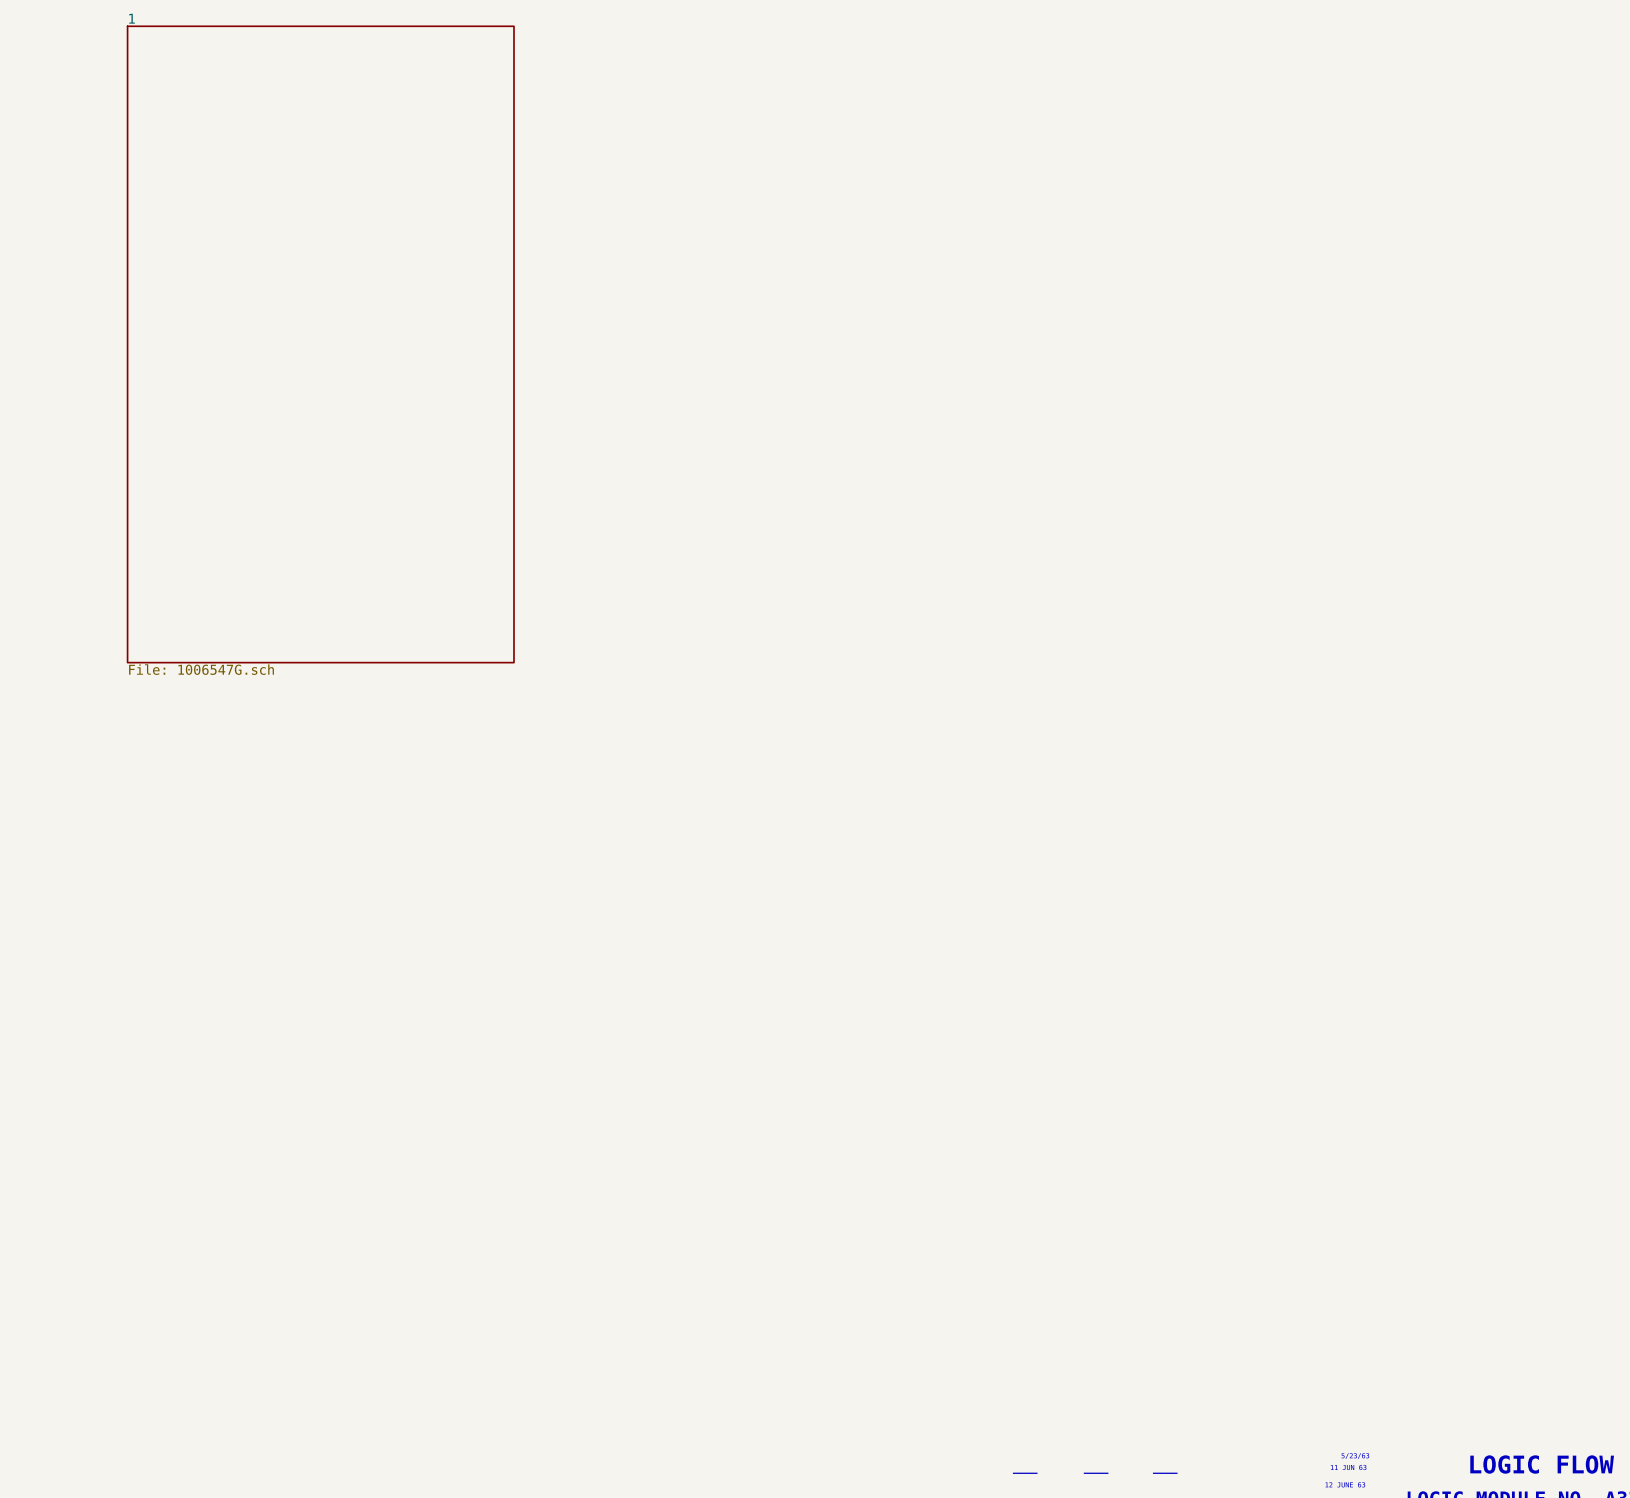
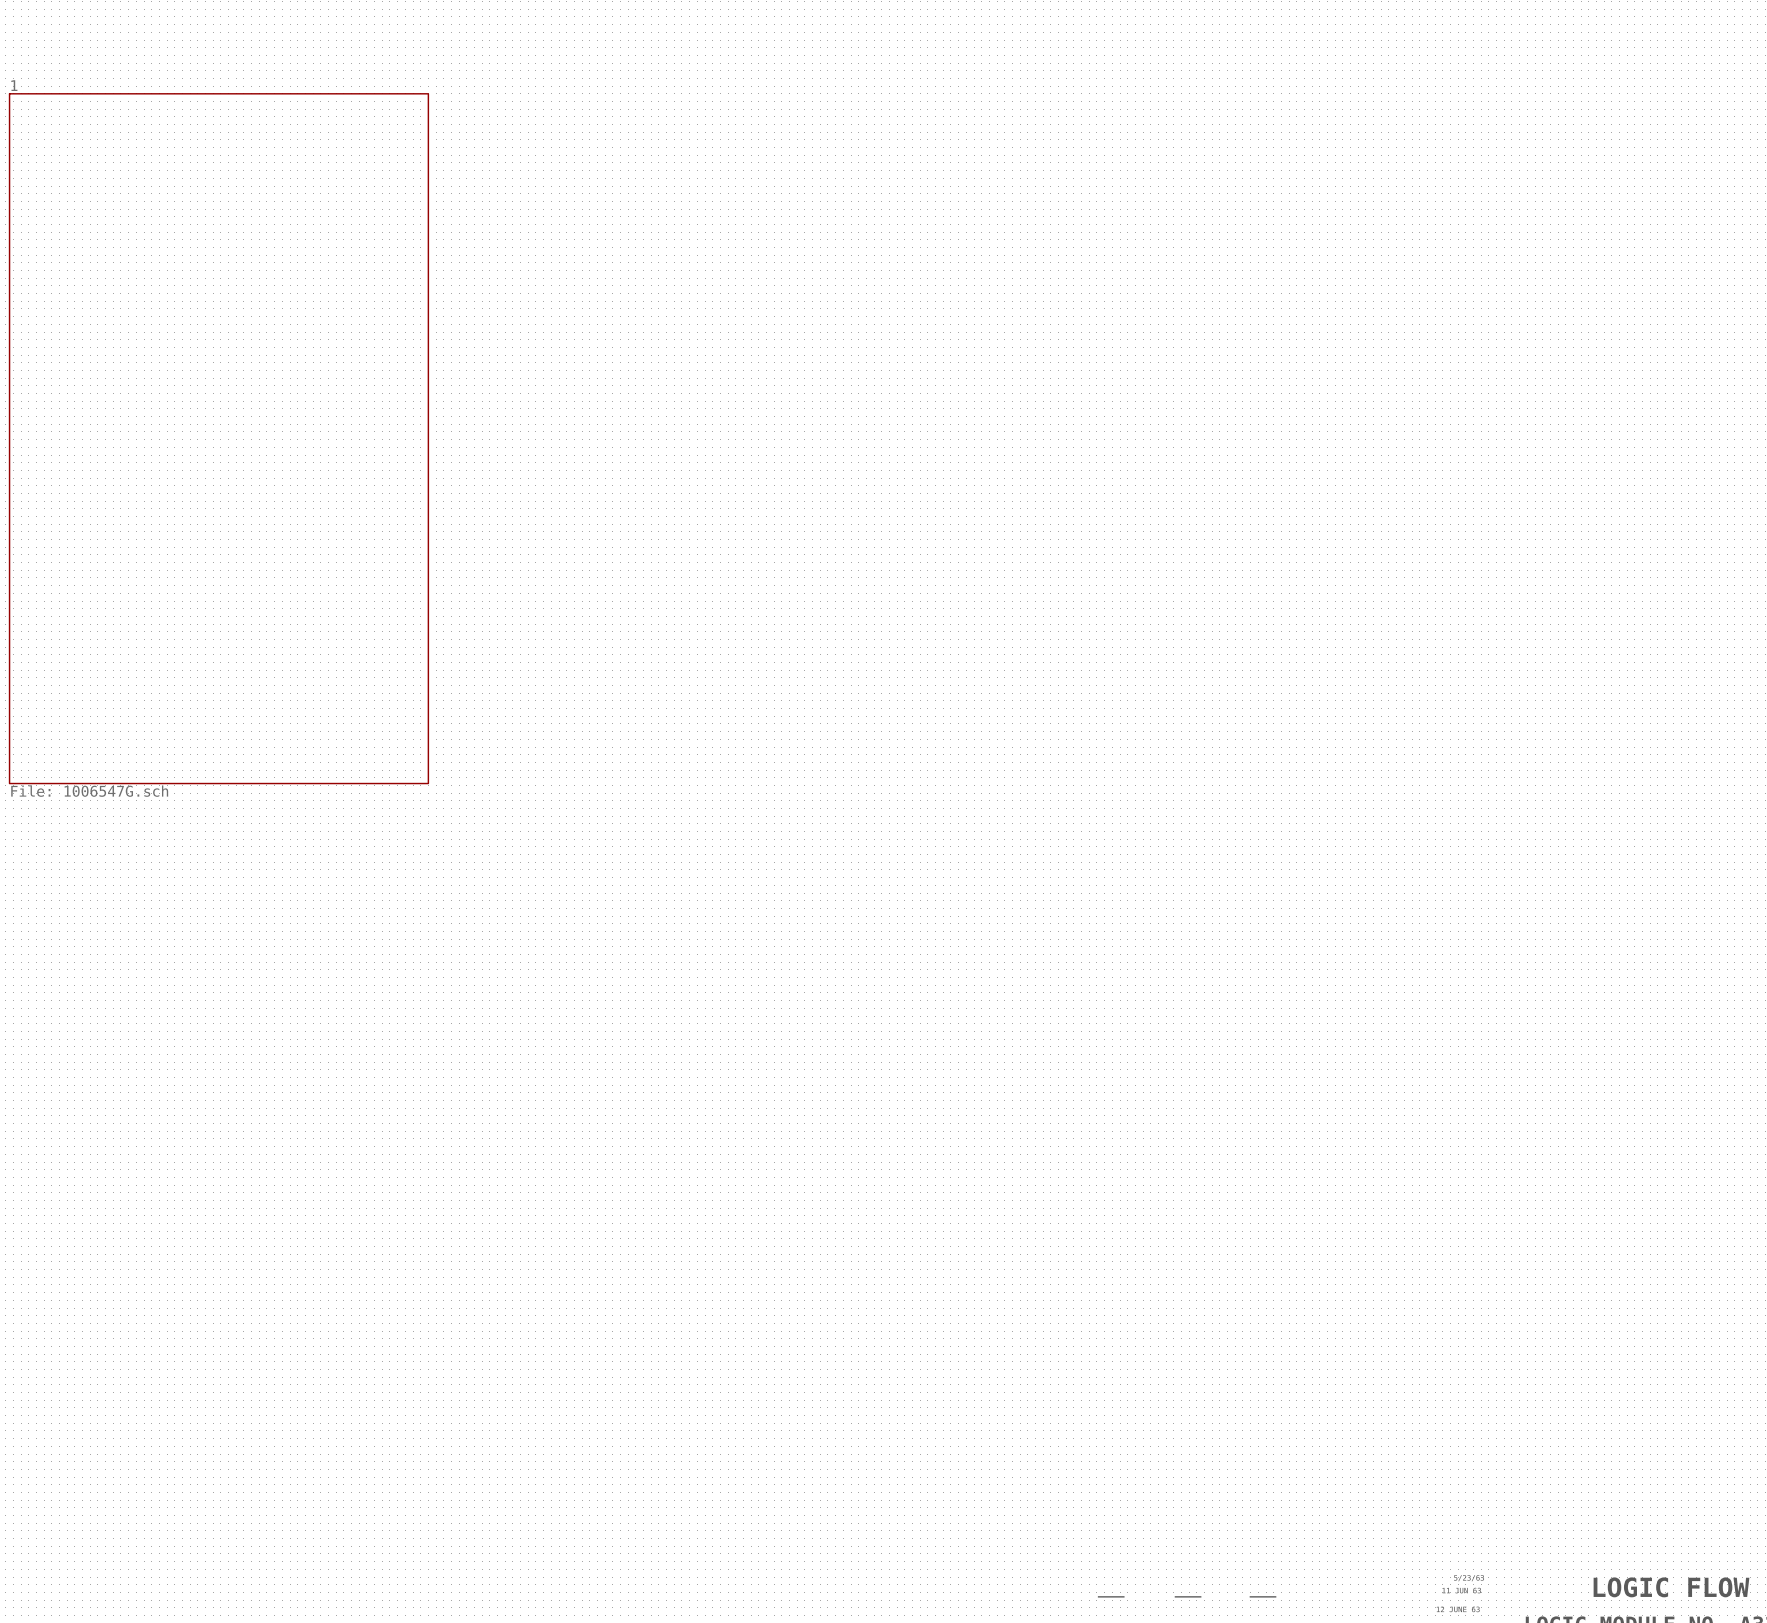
sheet 1 position: (320, 344) -> (218, 438)

